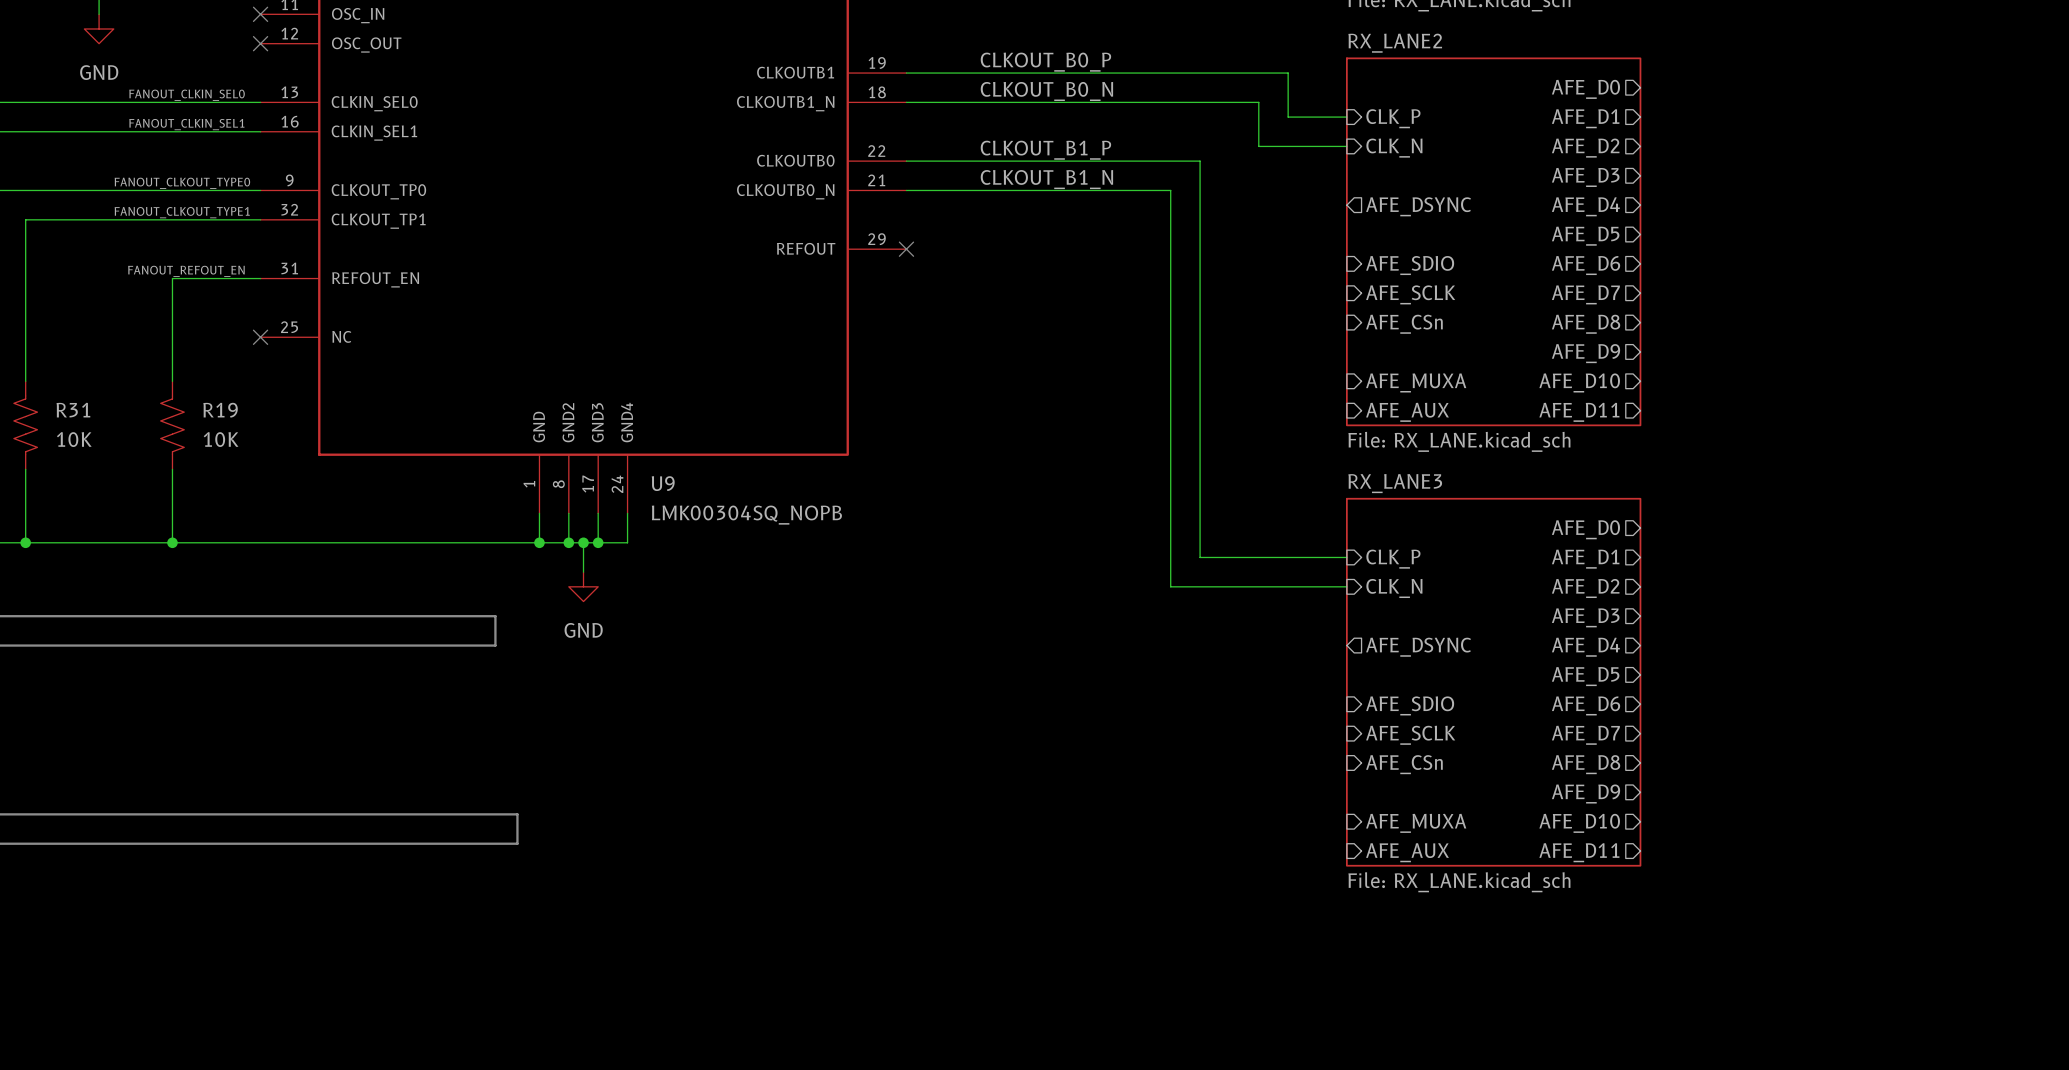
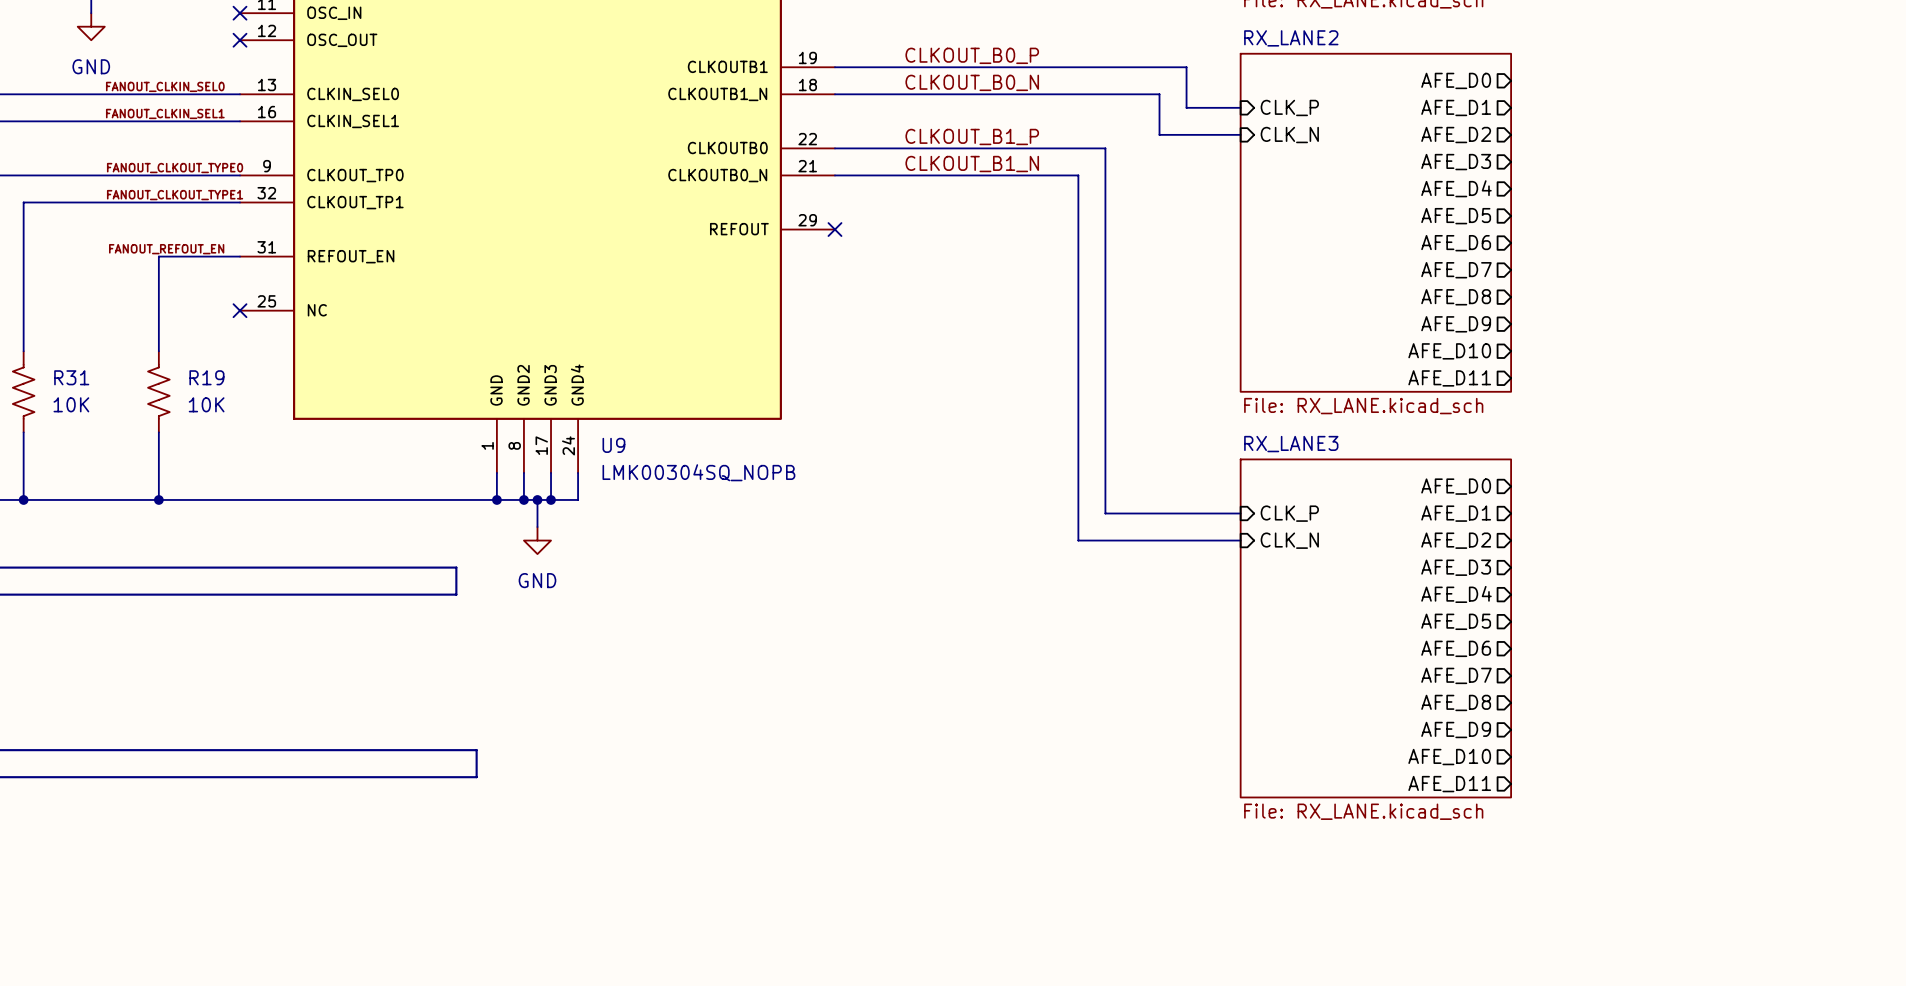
sheet pin: AFE_DSYNC (1418, 206) -> none
sheet pin: AFE_SDIO (1410, 265) -> none
sheet pin: AFE_SCLK (1410, 294) -> none
sheet pin: AFE_CSn (1404, 324) -> none
sheet pin: AFE_MUXA (1416, 382) -> none
sheet pin: AFE_AUX (1407, 412) -> none
sheet pin: AFE_DSYNC (1418, 647) -> none
sheet pin: AFE_SDIO (1410, 705) -> none
sheet pin: AFE_SCLK (1410, 735) -> none
sheet pin: AFE_CSn (1404, 764) -> none
sheet pin: AFE_MUXA (1416, 823) -> none
sheet pin: AFE_AUX (1407, 852) -> none

